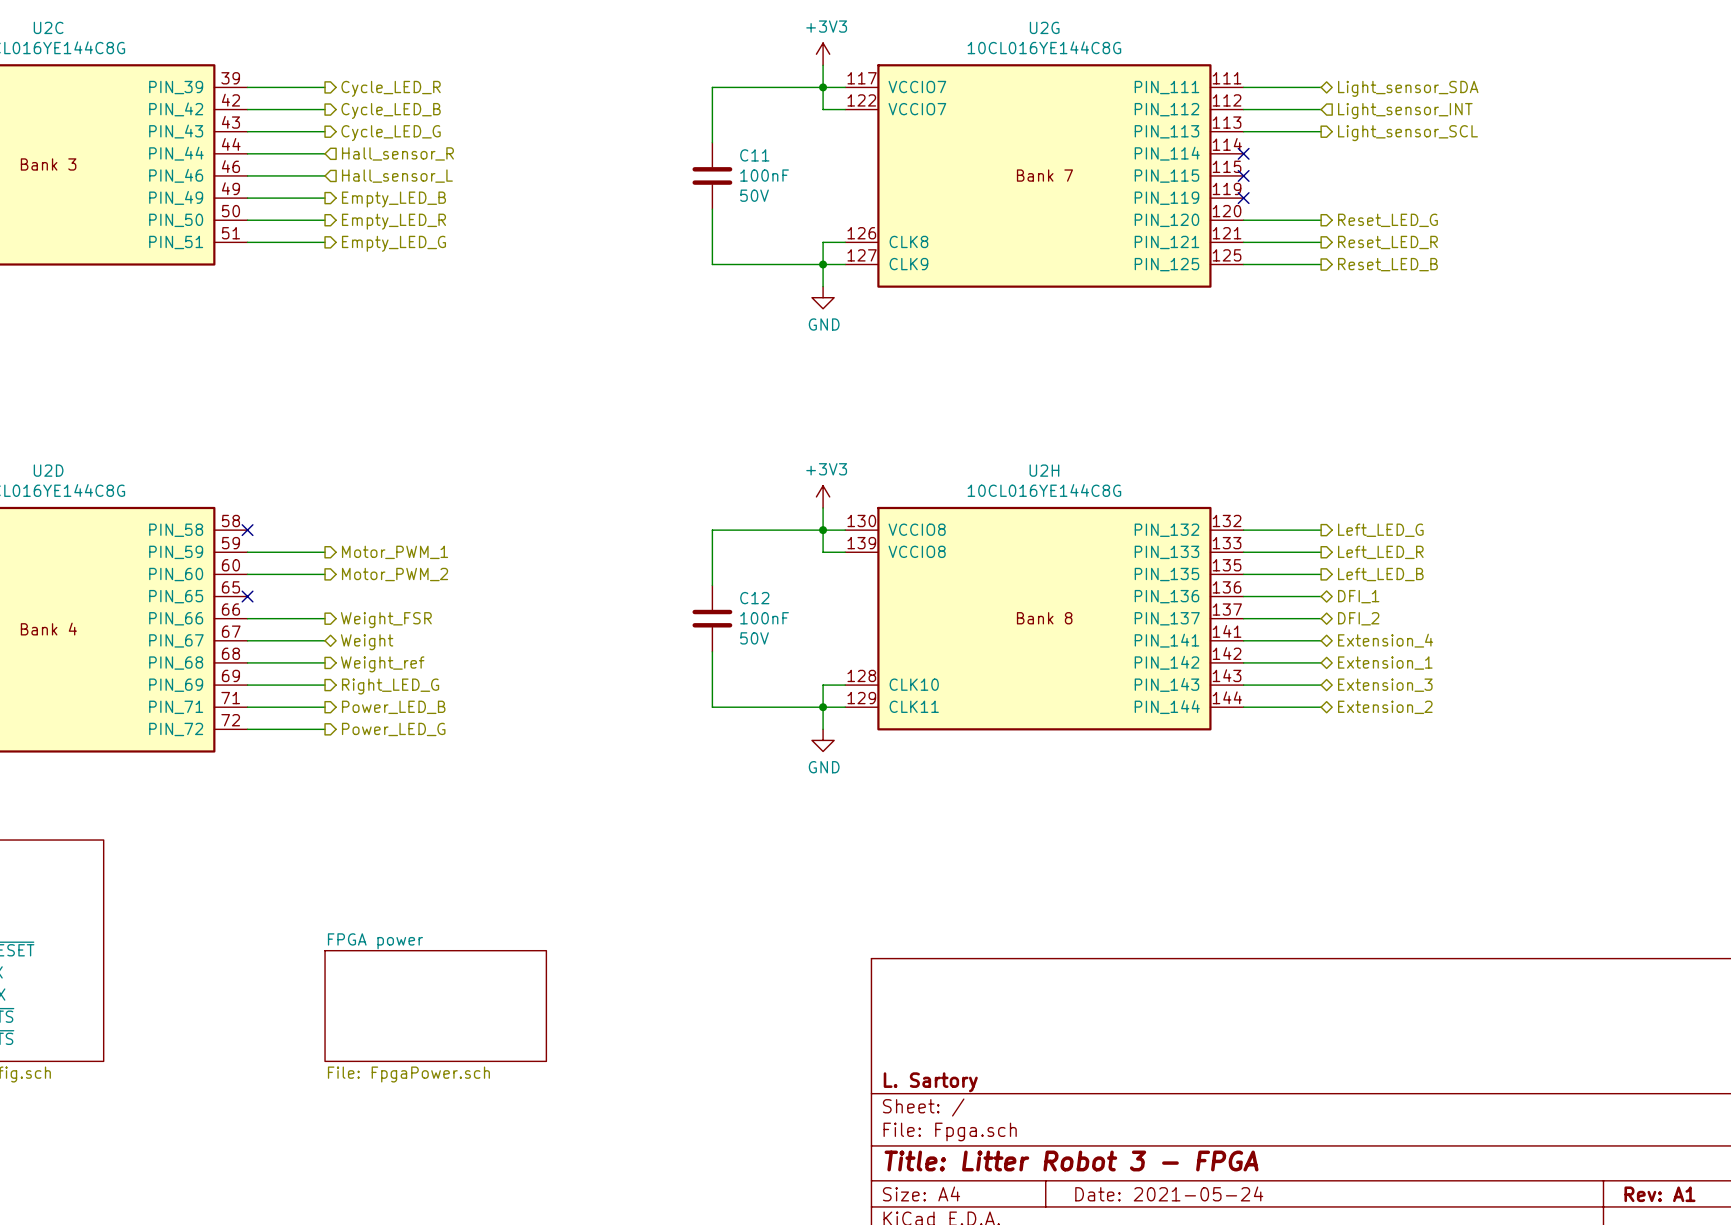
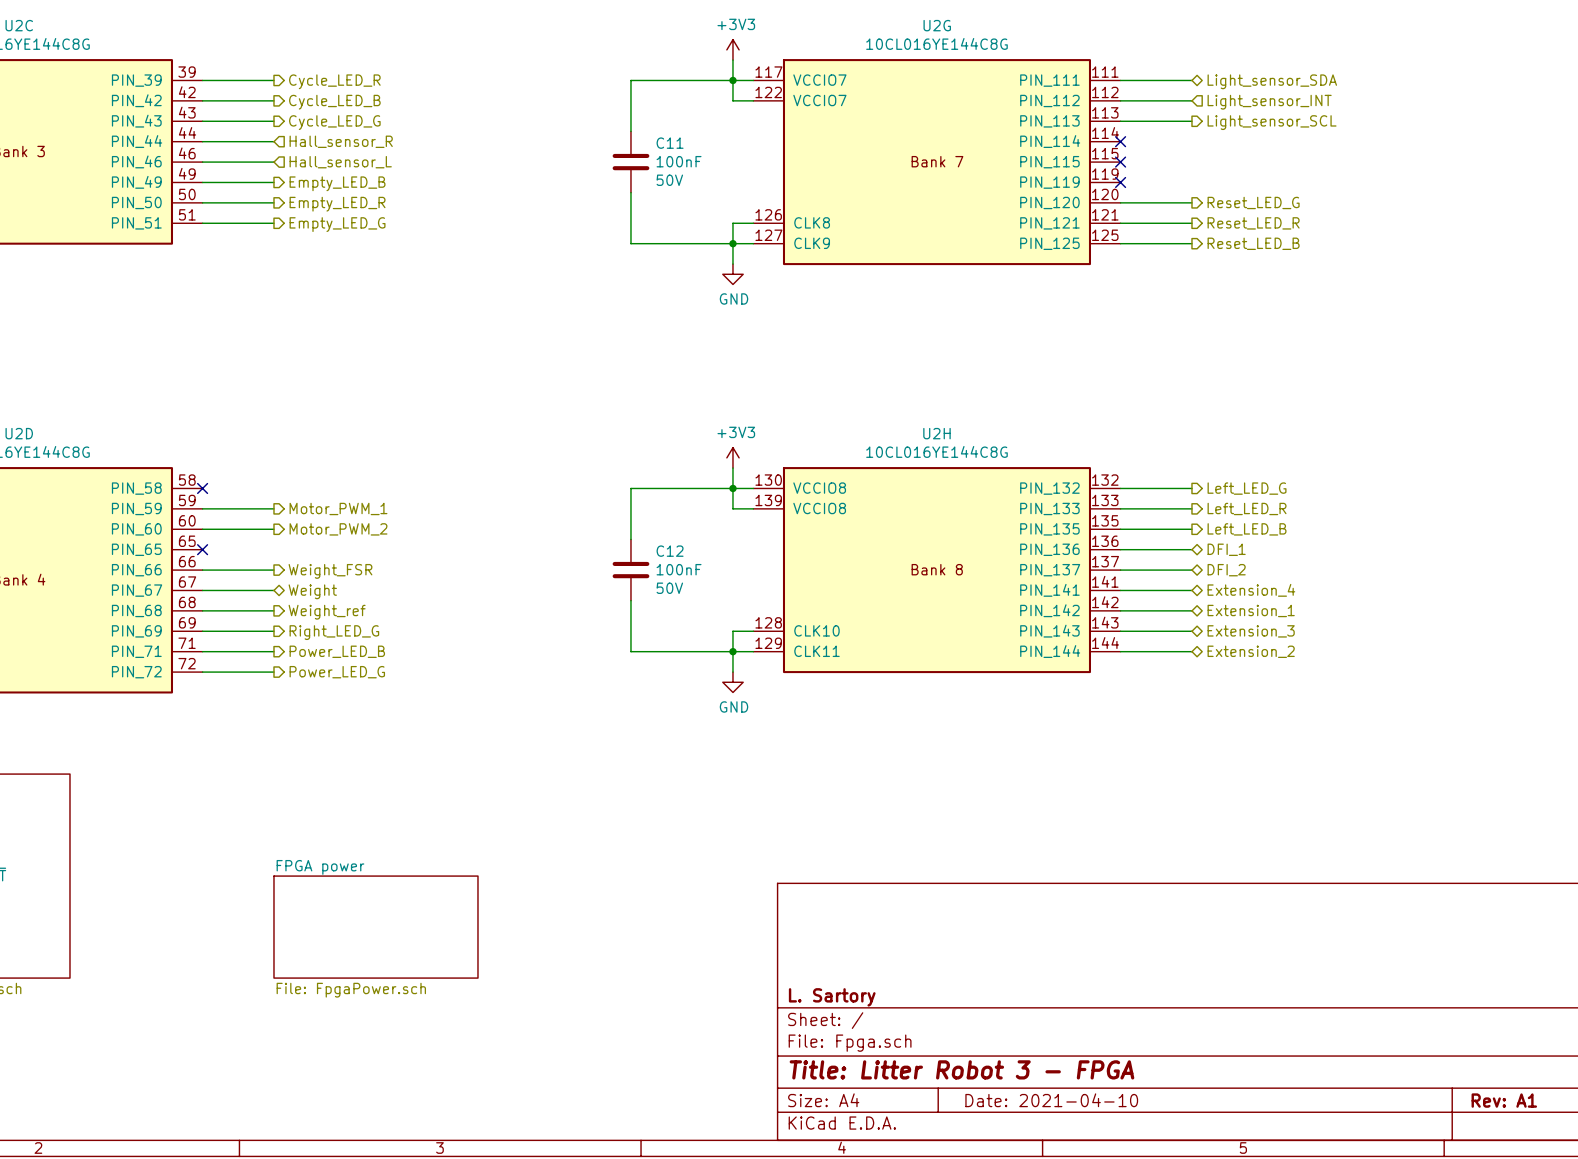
title block: Date: 2021-05-24 (1169, 1193) -> Date: 2021-04-10 (1051, 1100)

